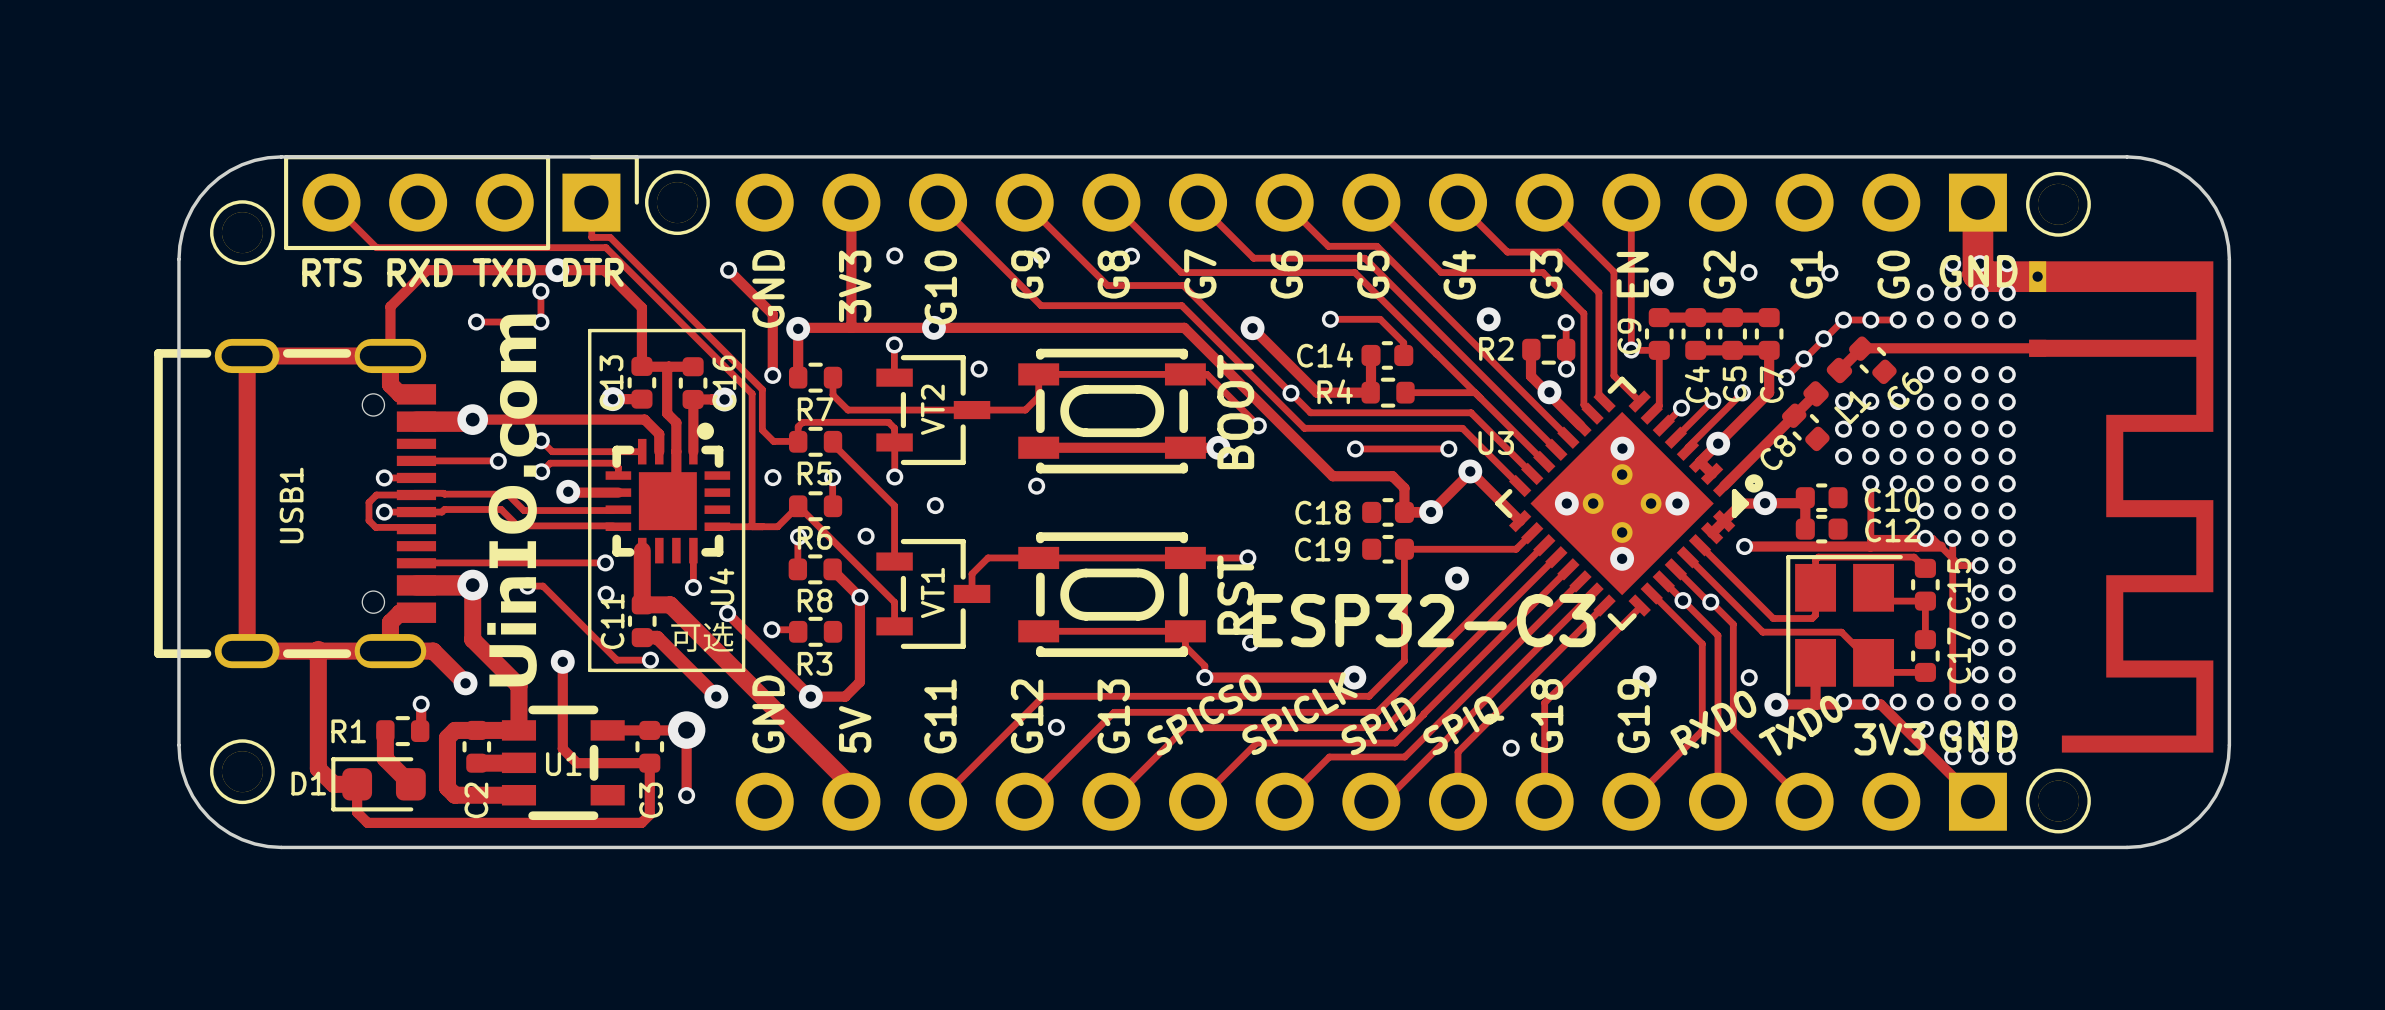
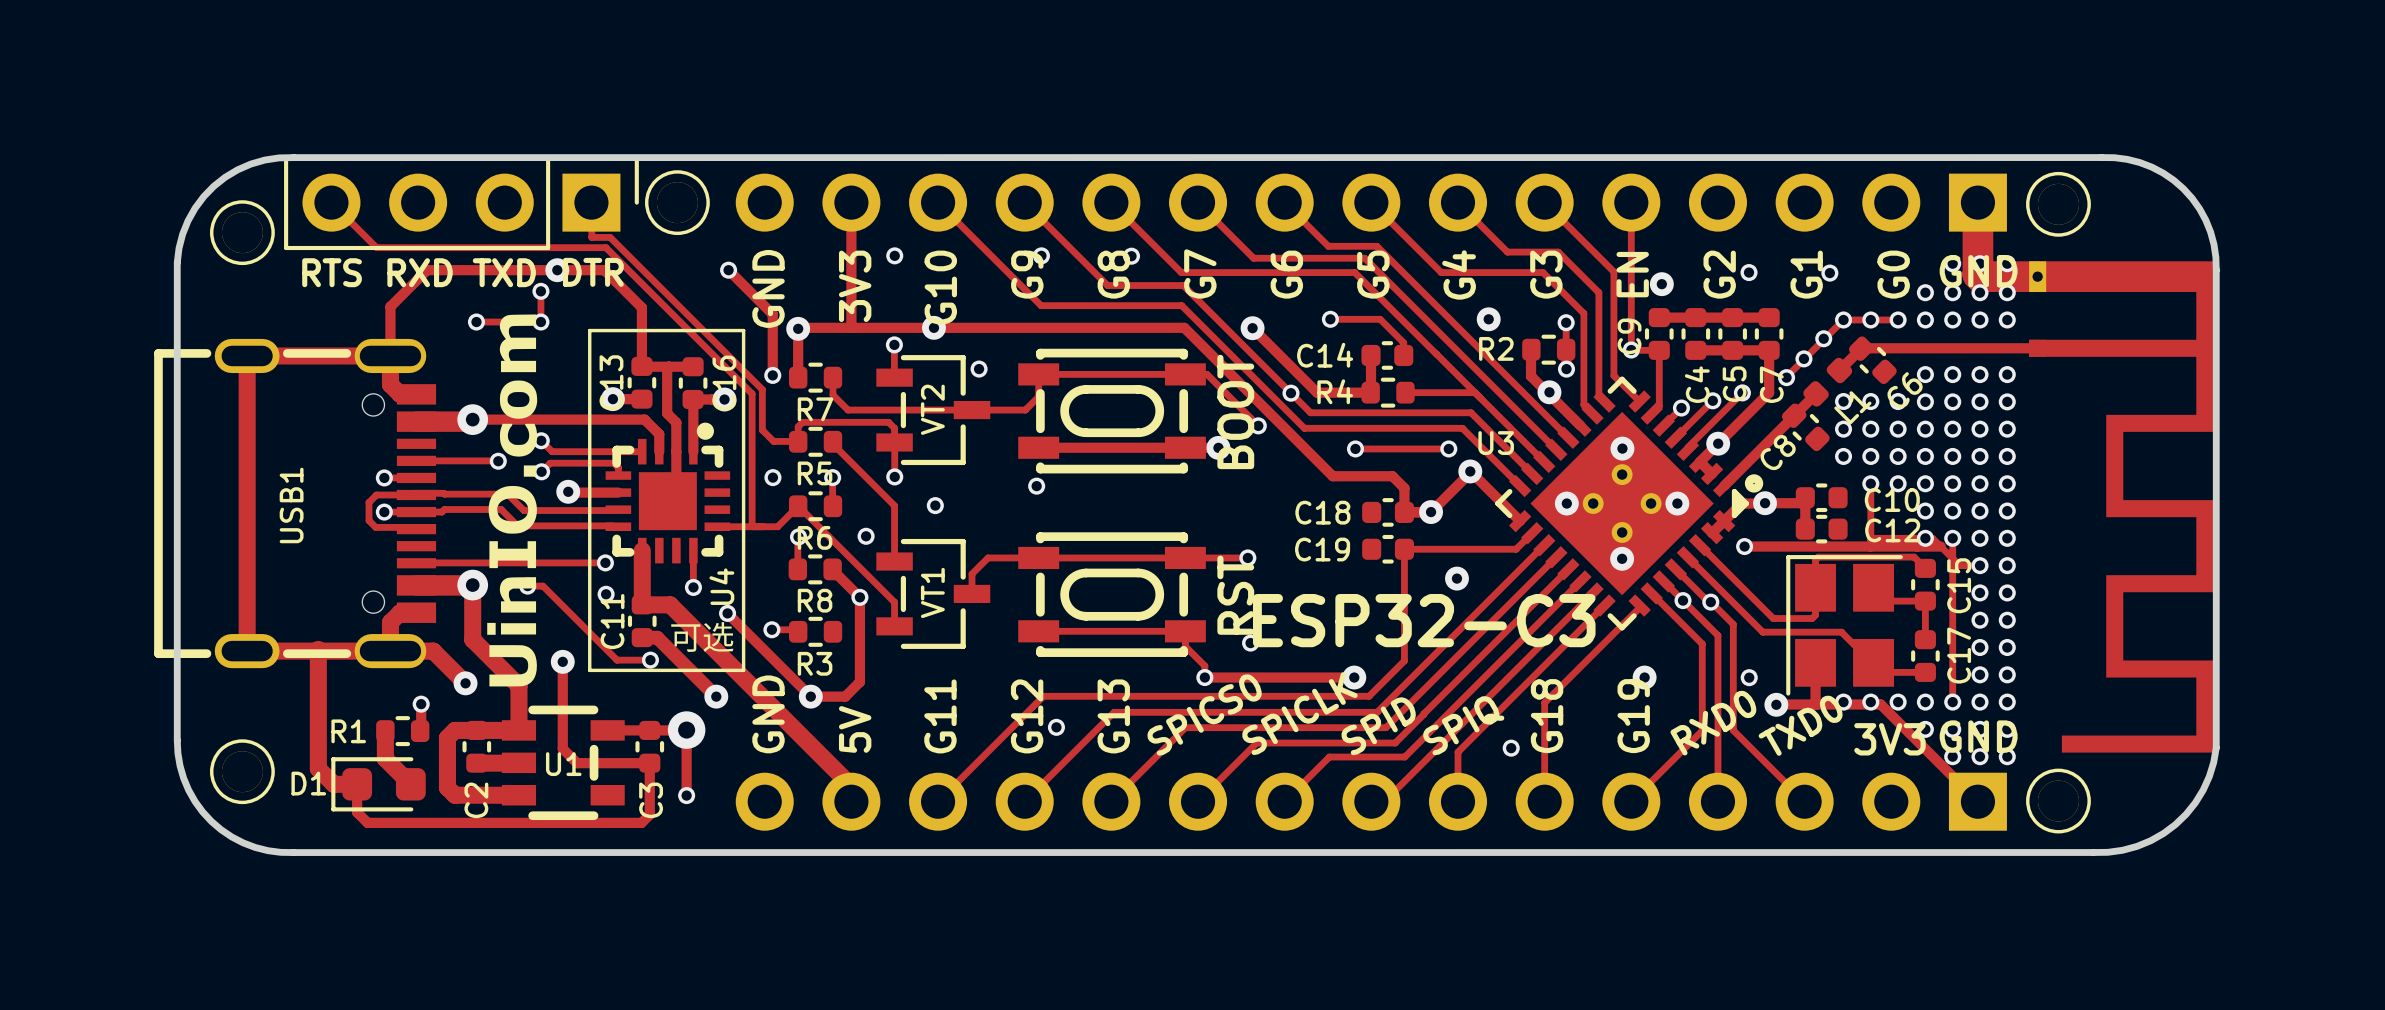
board edge: (281, 156) (2127, 156) (2153, 160) (2178, 170) (2199, 186) (2208, 196) (2221, 220) (2228, 245) (2229, 745) (2225, 771) (2215, 796) (2208, 807) (2189, 826) (2166, 839) (2153, 843) (2127, 847) (281, 847) (254, 843) (242, 839) (219, 826) (200, 807) (186, 784) (179, 758) (178, 259) (182, 232) (186, 220) (200, 196) (208, 186) (230, 170) (242, 164) (254, 160) (281, 156) -> (293, 157) (264, 160) (250, 164) (225, 177) (213, 186) (203, 196) (188, 220) (179, 248) (177, 262) (177, 753) (183, 778) (202, 811) (221, 829) (255, 847) (293, 852) (2107, 852) (2136, 846) (2150, 840) (2175, 824) (2195, 802) (2209, 776) (2216, 747) (2215, 257) (2210, 232) (2205, 220) (2192, 198) (2173, 180) (2151, 167) (2139, 162) (2114, 157) (2101, 157) (293, 157)

